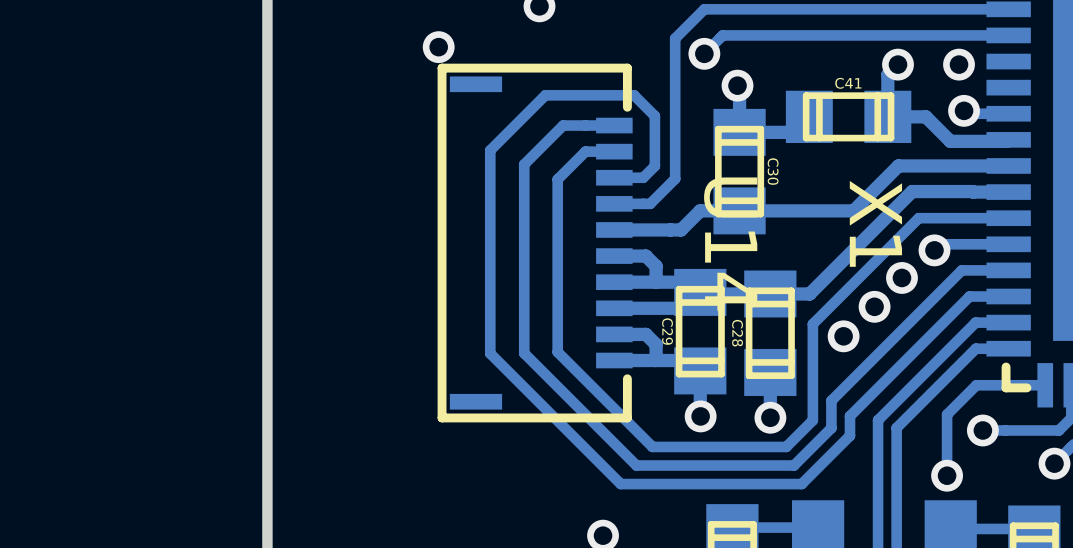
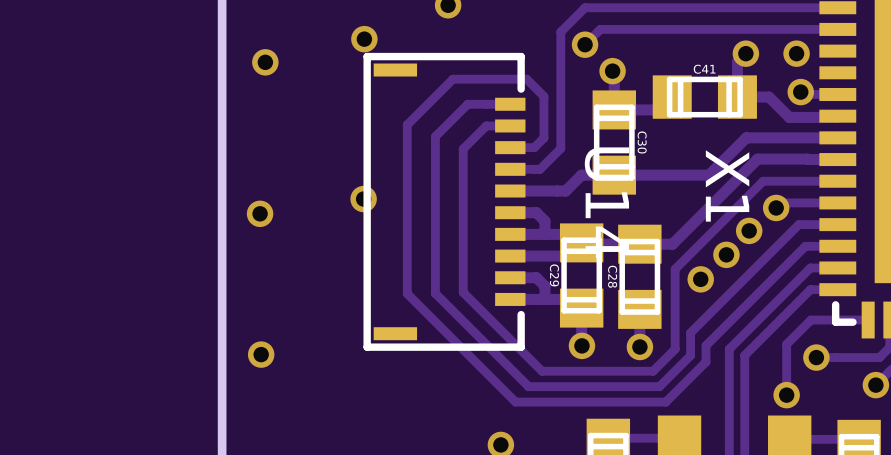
via: none -> (265, 62)
via: none -> (363, 199)
via: none -> (260, 213)
via: none -> (261, 354)

